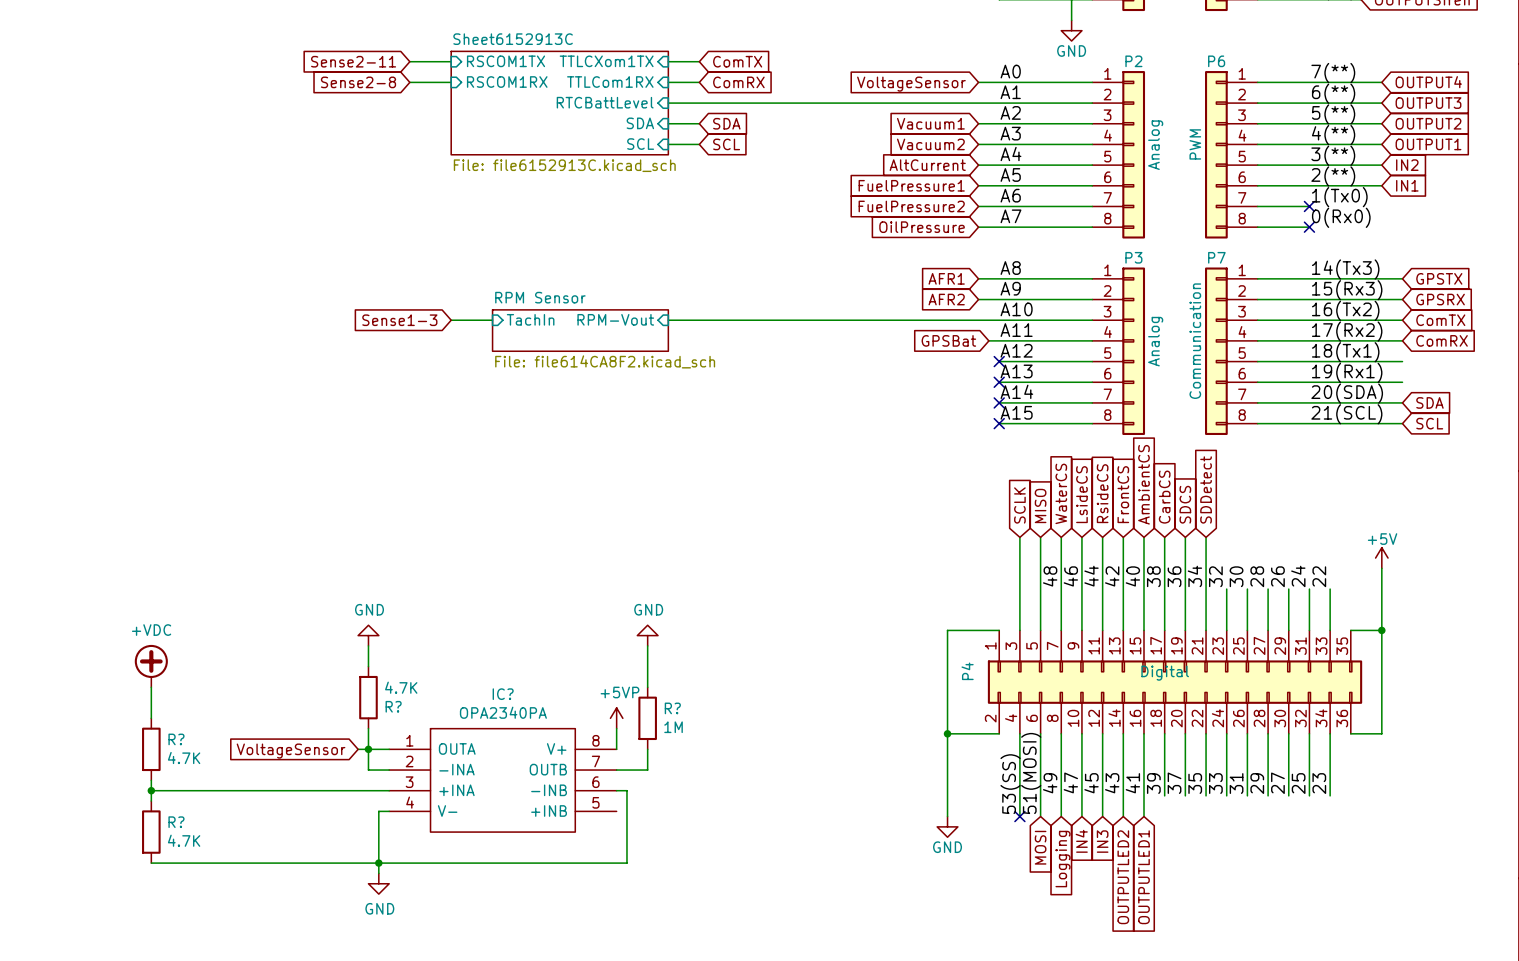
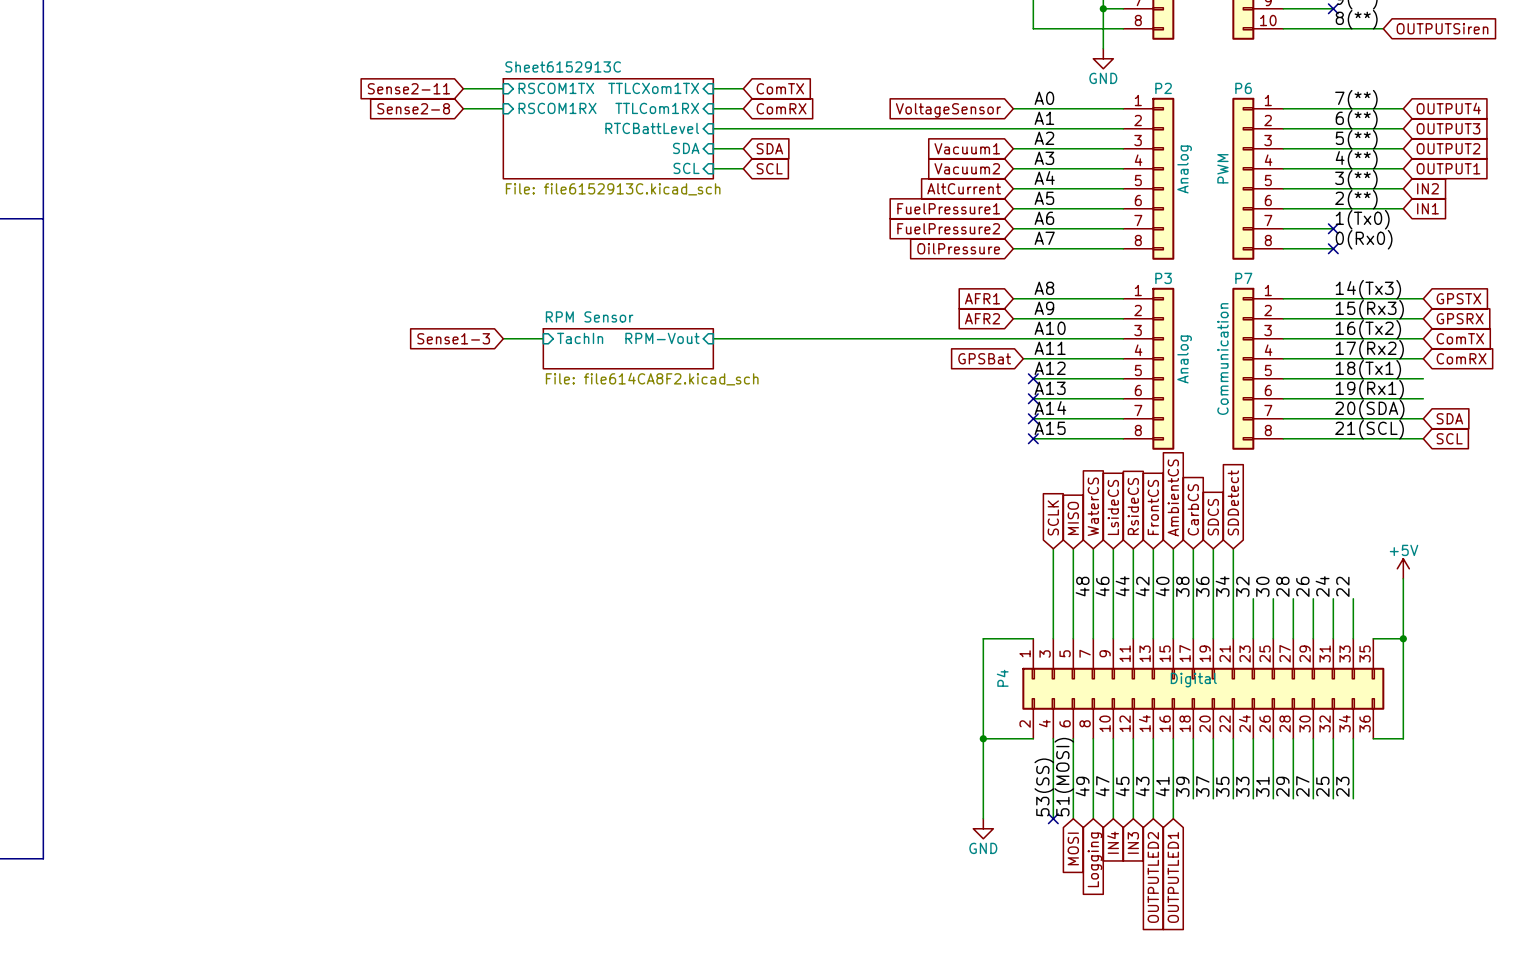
power symbol: GND (368, 635) -> none
power symbol: GND (647, 635) -> none
wire: (368, 645) (368, 666) -> none
wire: (647, 645) (647, 687) -> none
power symbol: +VDC (151, 666) -> none
wire: (151, 687) (151, 718) -> none
R?: 4.7K (368, 697) -> none
power symbol: +5VP (616, 718) -> none
R?: 1M (647, 718) -> none
wire: (368, 728) (368, 770) (389, 770) -> none
wire: (616, 728) (616, 749) -> none
R?: 4.7K (151, 749) -> none
wire: (358, 749) (389, 749) -> none
junction: (368, 749) -> none
wire: (647, 749) (647, 770) (616, 770) -> none
global label: VoltageSensor (291, 751) -> none
wire: (151, 780) (151, 801) -> none
IC?: OPA2340PA (502, 780) -> none
wire: (151, 790) (389, 790) -> none
junction: (151, 790) -> none
wire: (616, 790) (626, 790) (626, 863) (151, 863) -> none
wire: (389, 811) (378, 811) (378, 873) -> none
R?: 4.7K (151, 832) -> none
junction: (378, 863) -> none
power symbol: GND (378, 883) -> none

